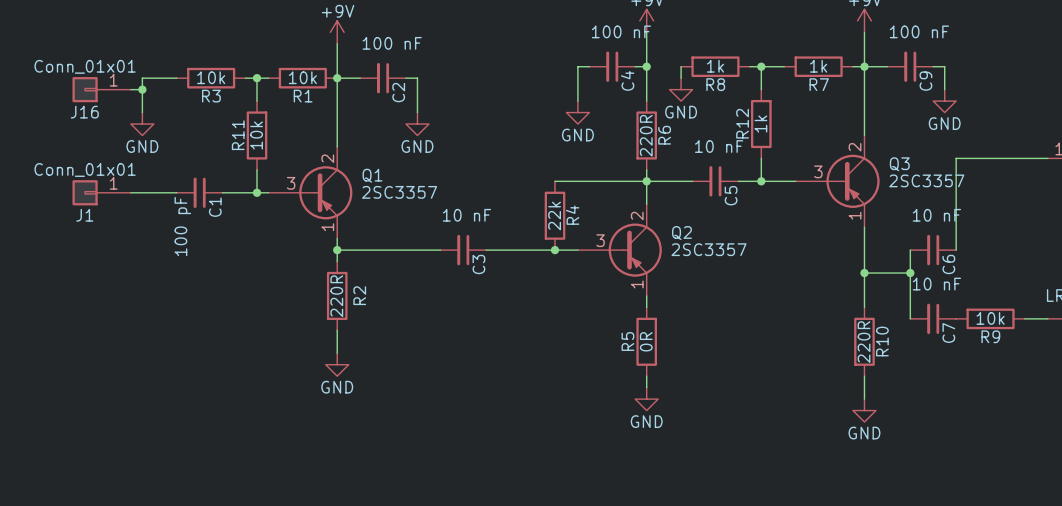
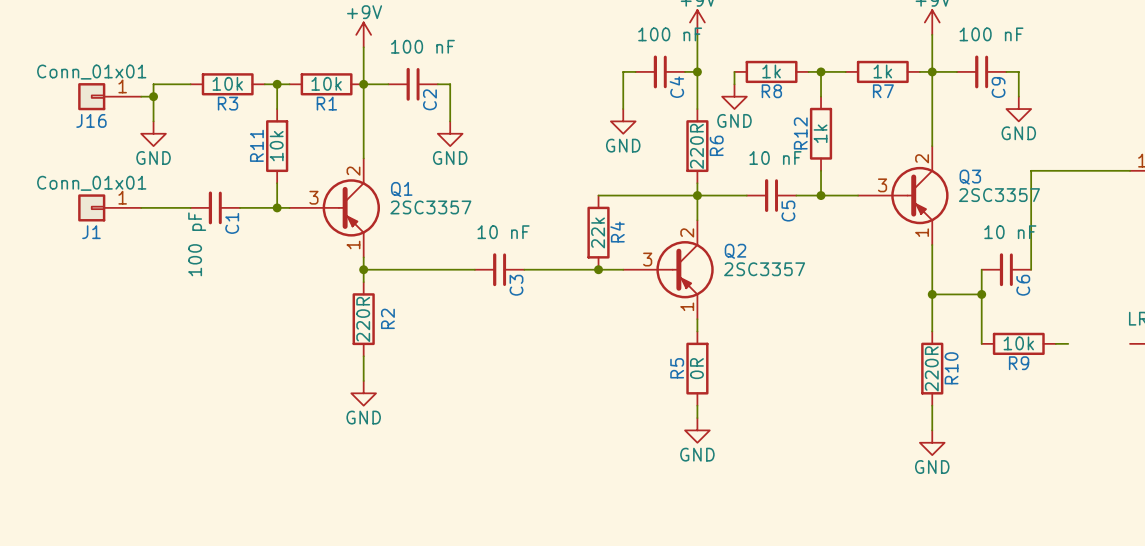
C7: 10 nF (933, 318) -> none
wire: none -> (1055, 343) (1068, 343)
R9 position: (990, 318) -> (1018, 343)
wire: (1024, 318) (1047, 318) -> none

